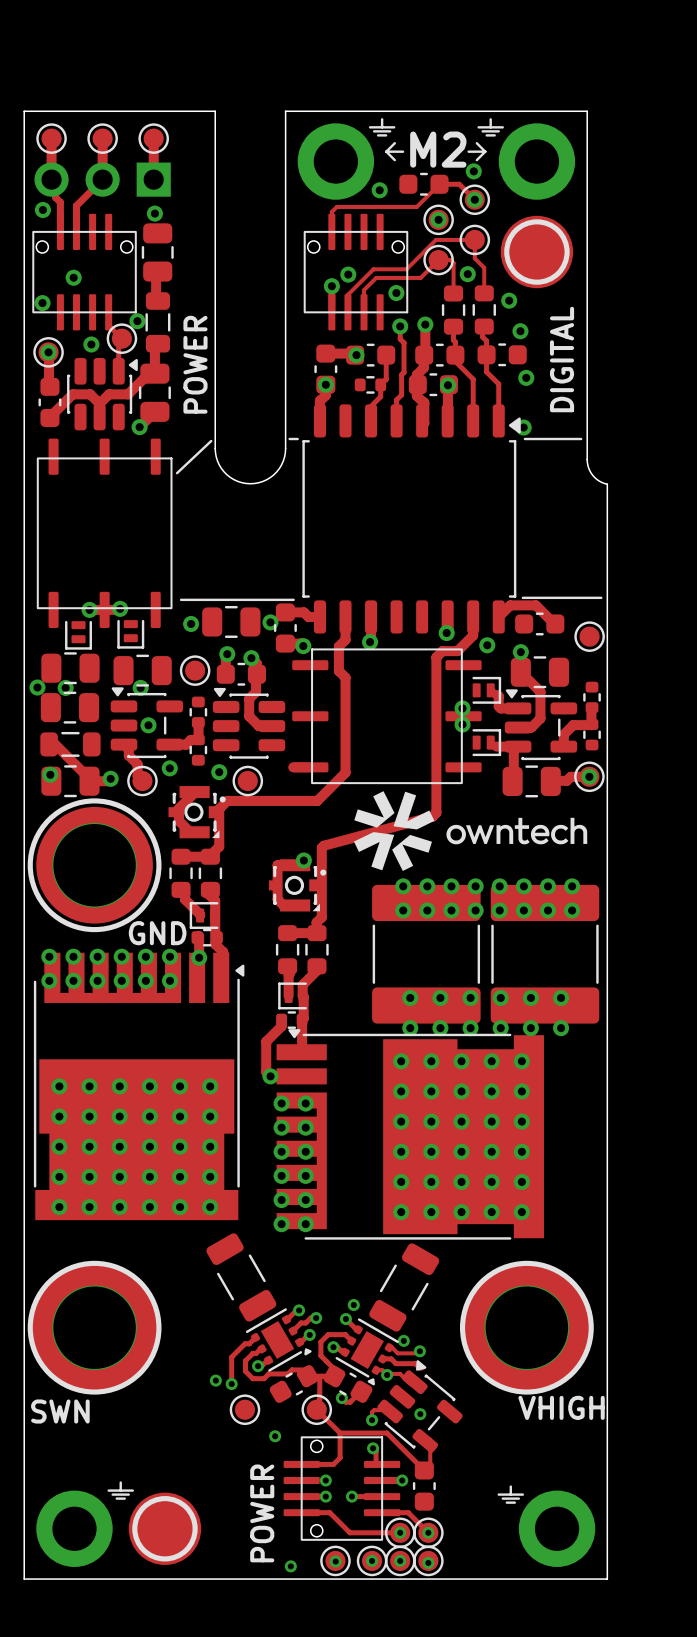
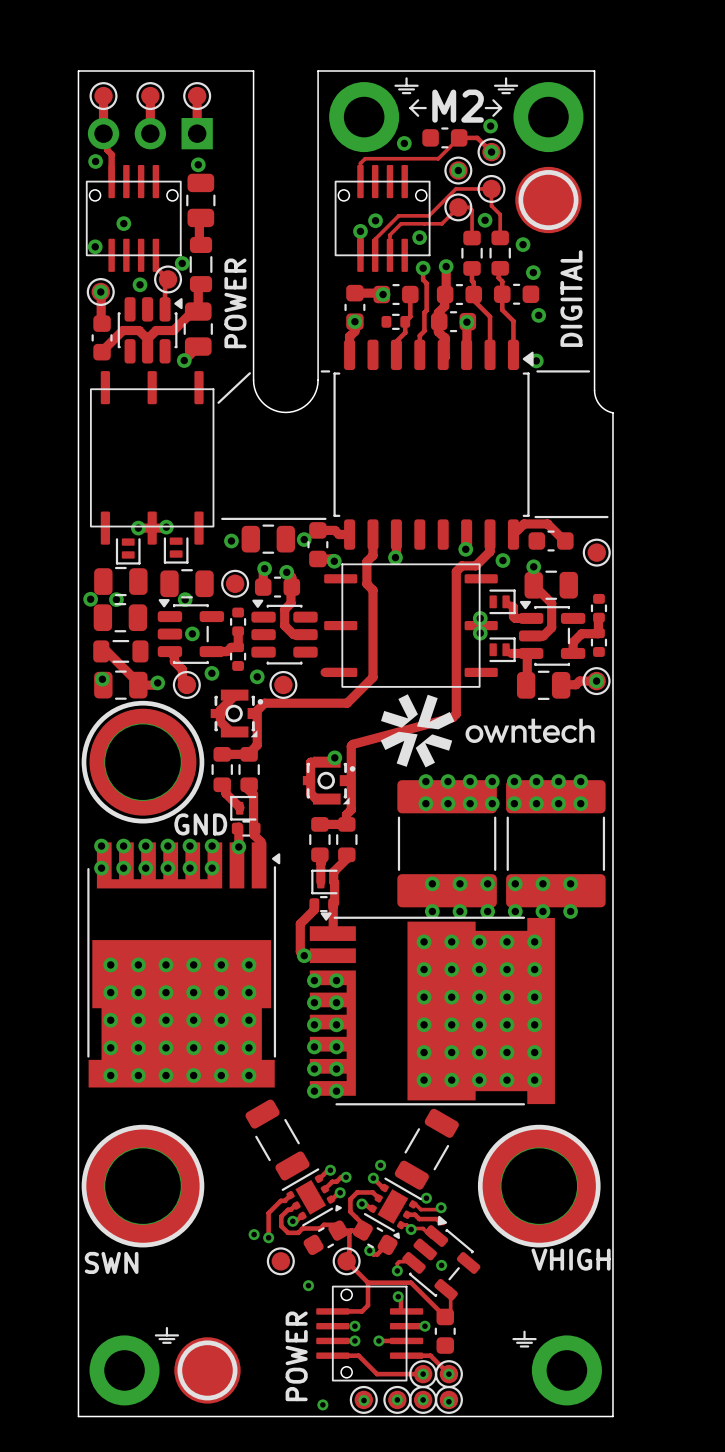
track: (102, 179) (76, 205) (76, 231) -> none

